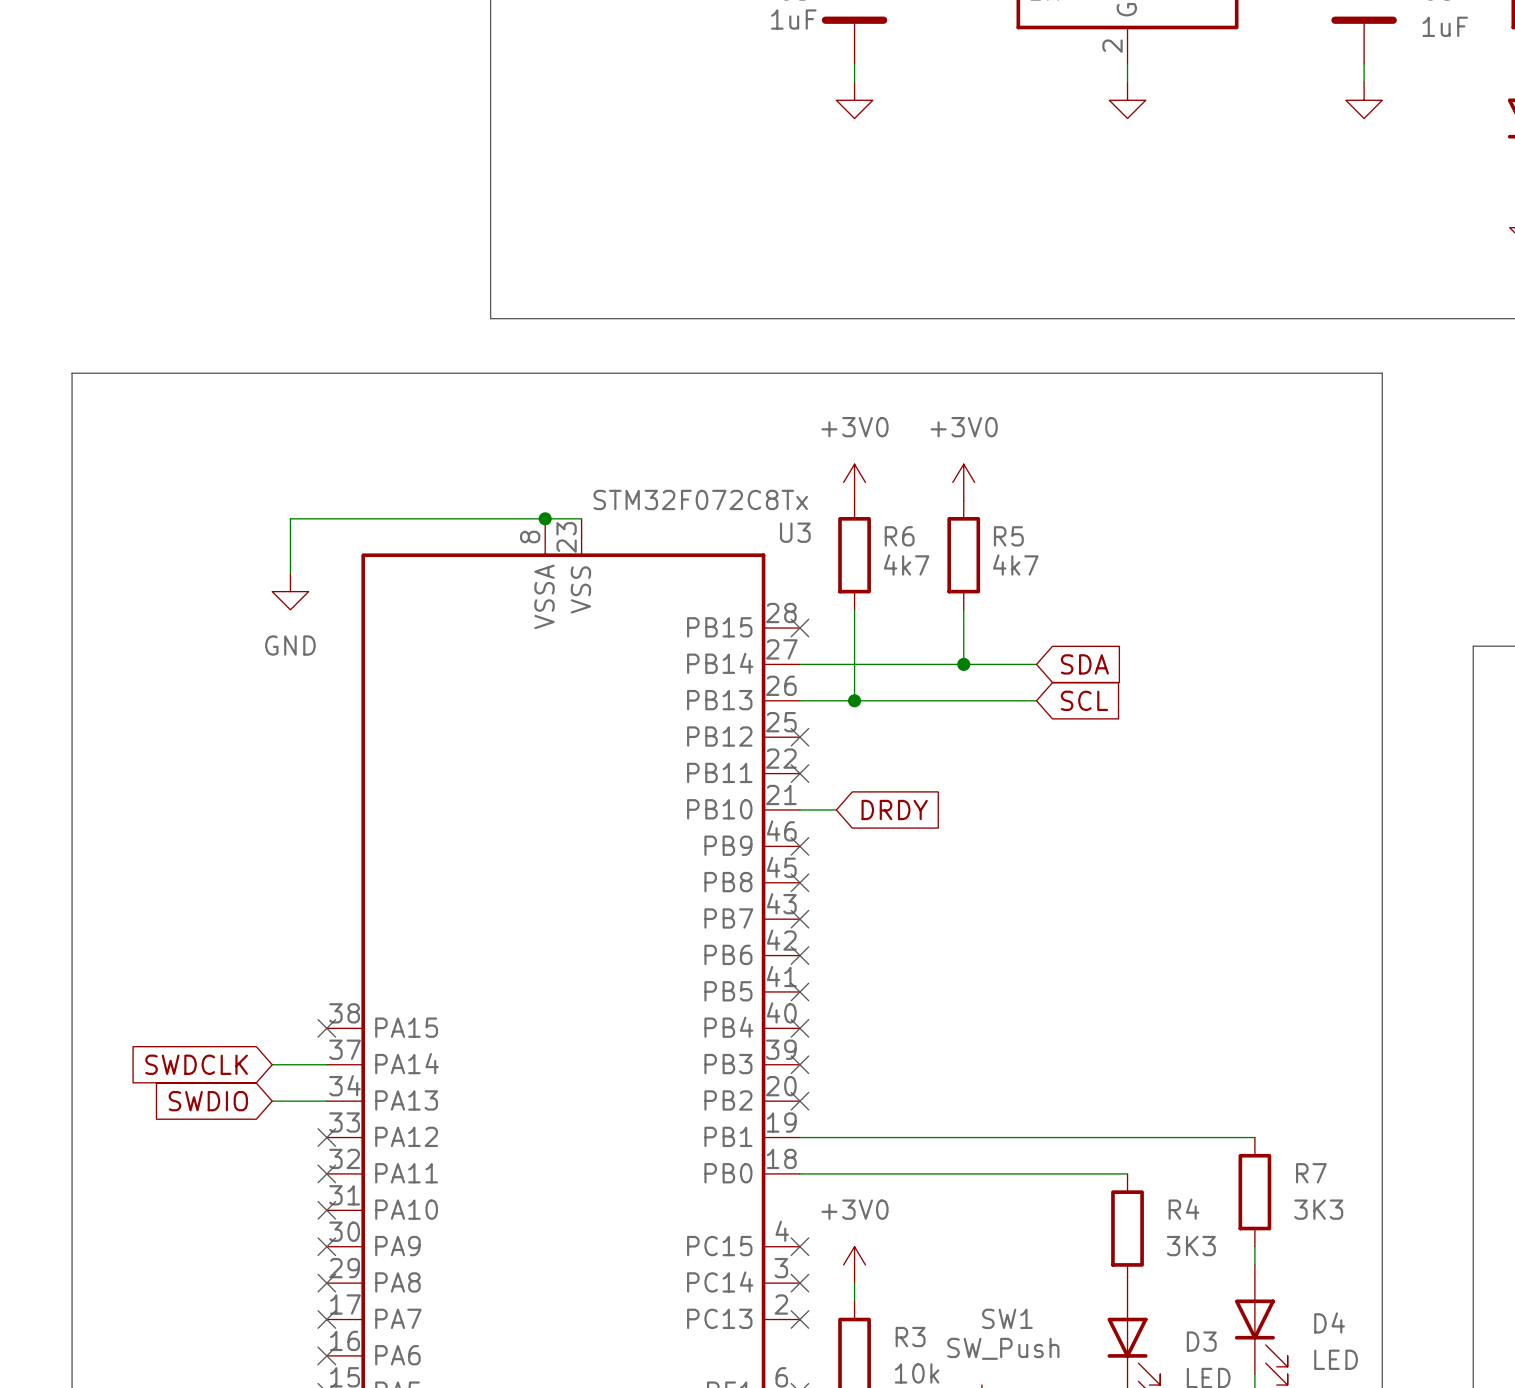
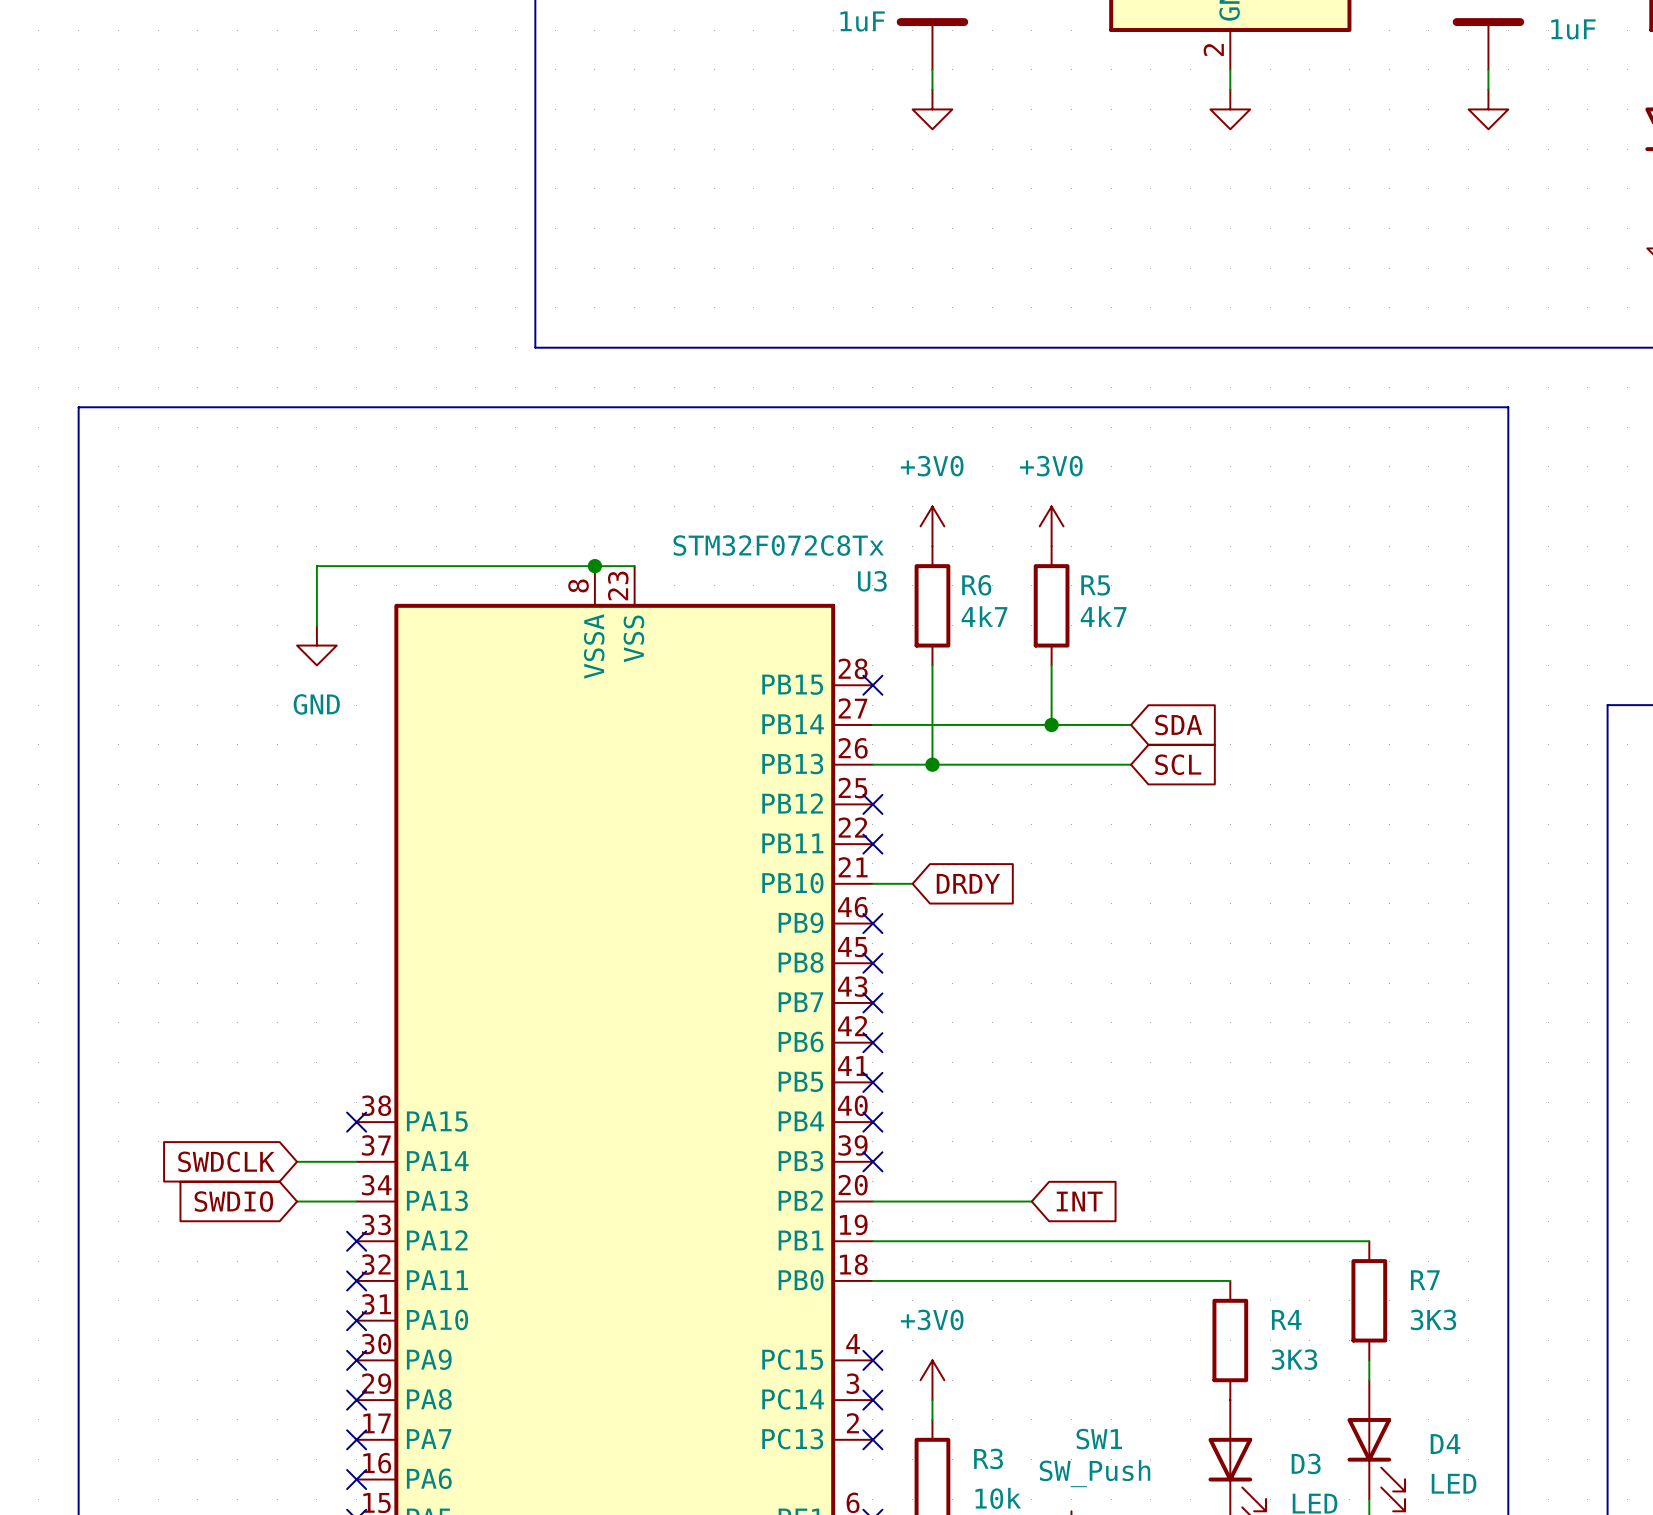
wire: none -> (872, 1201) (1031, 1201)
no-connect mark: (799, 1101) -> none
global label: none -> INT (1079, 1201)

